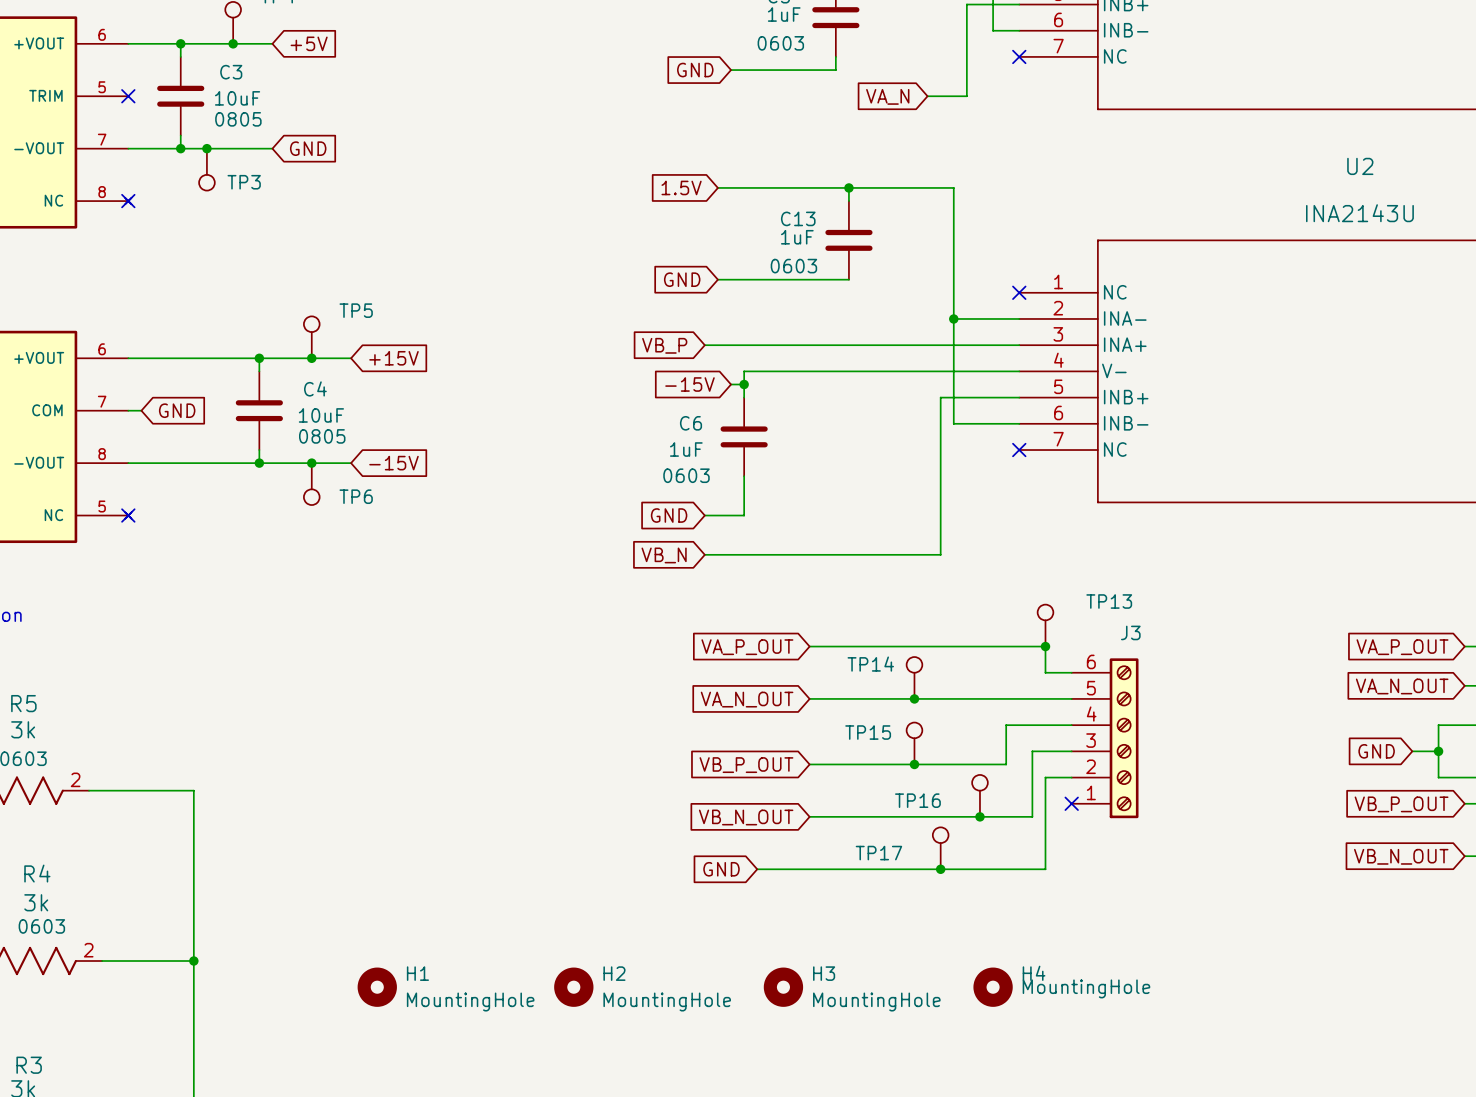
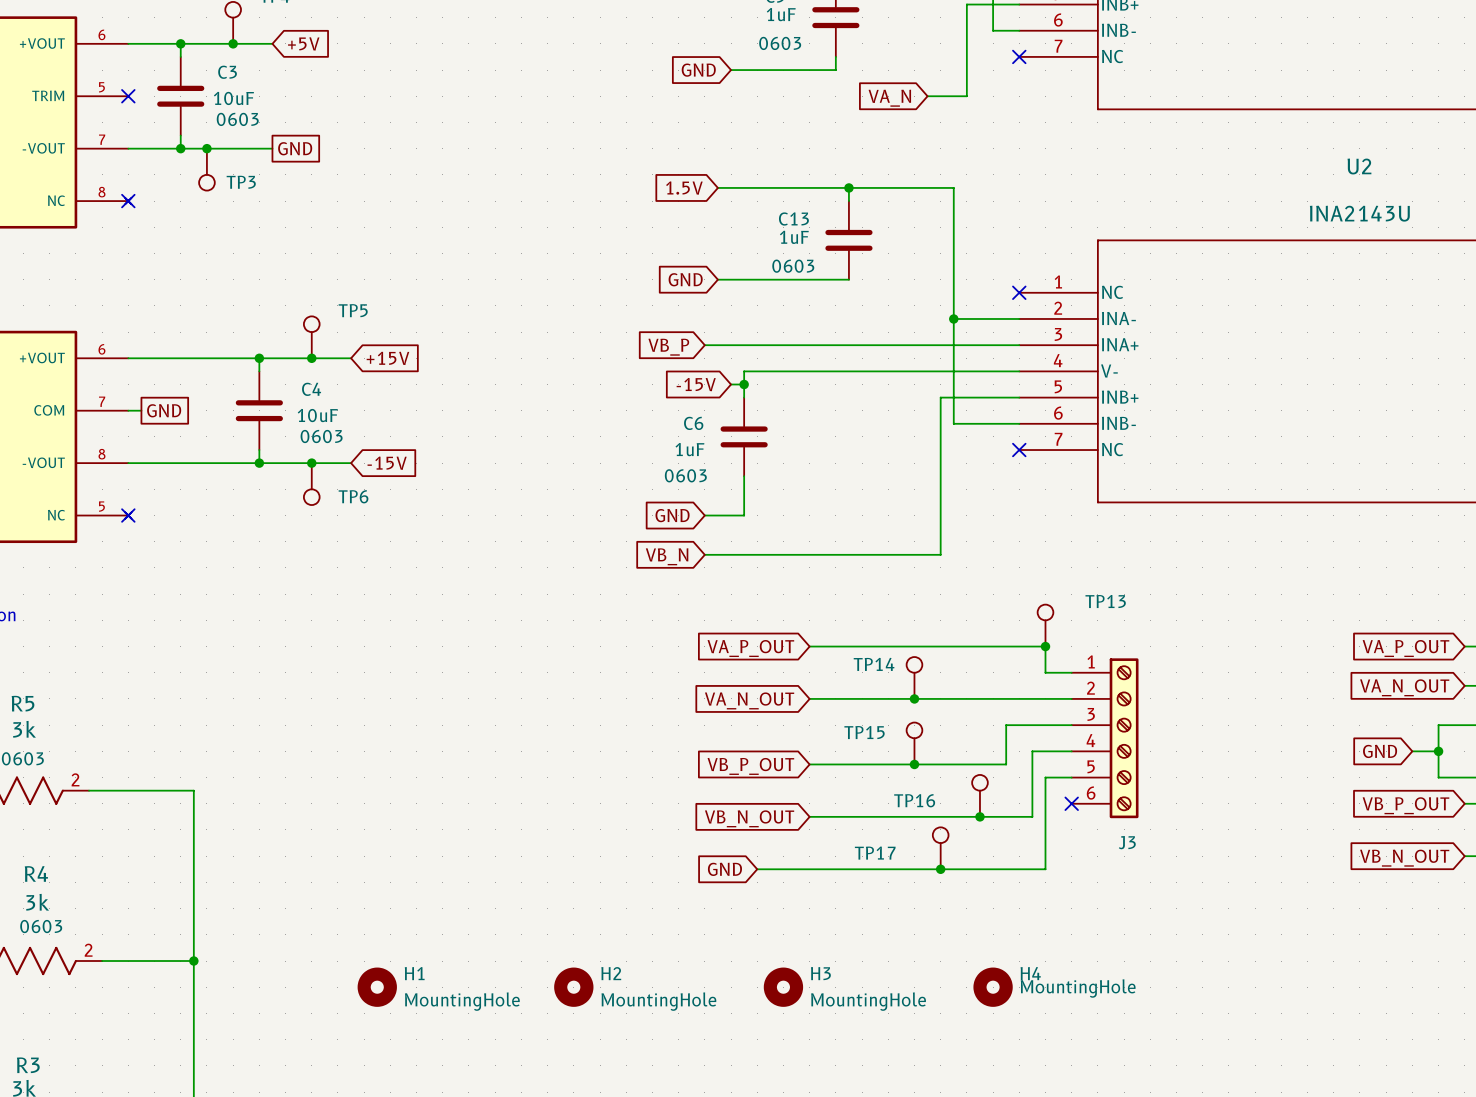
C3 text: 0805 (238, 119) -> 0603 (237, 119)
global label shape: input (308, 148) -> passive (295, 148)
global label shape: input (177, 410) -> passive (164, 410)
C4 text: 0805 (322, 436) -> 0603 (321, 436)
J3 flip: as is (1124, 738) -> up-down (1124, 738)

